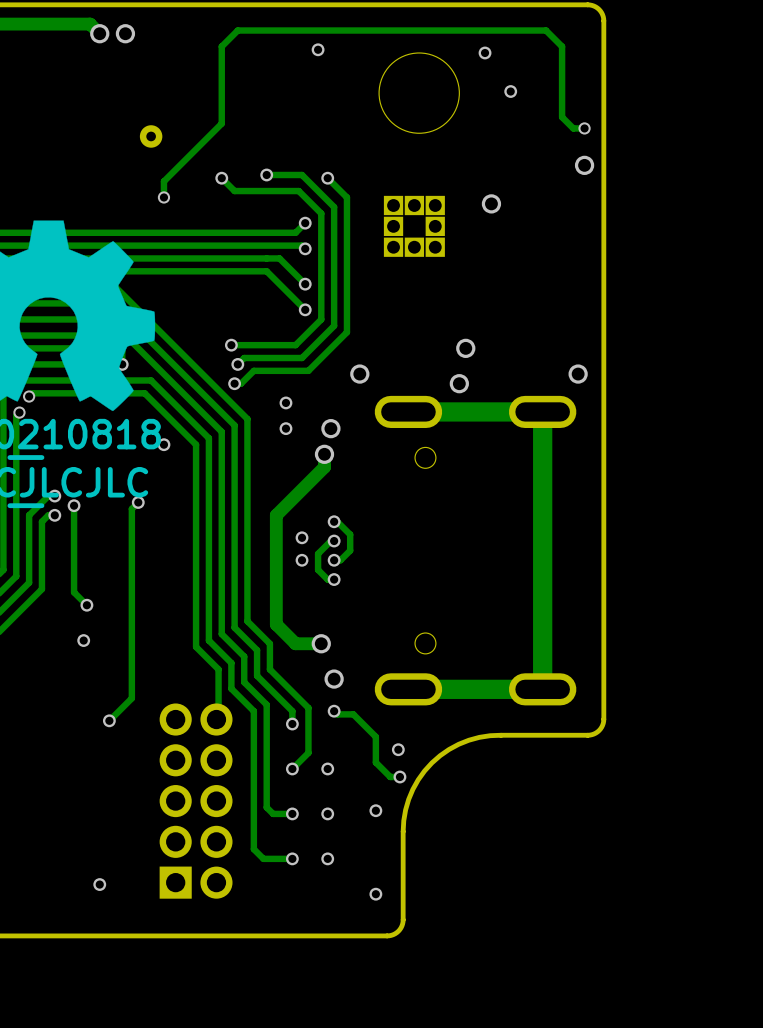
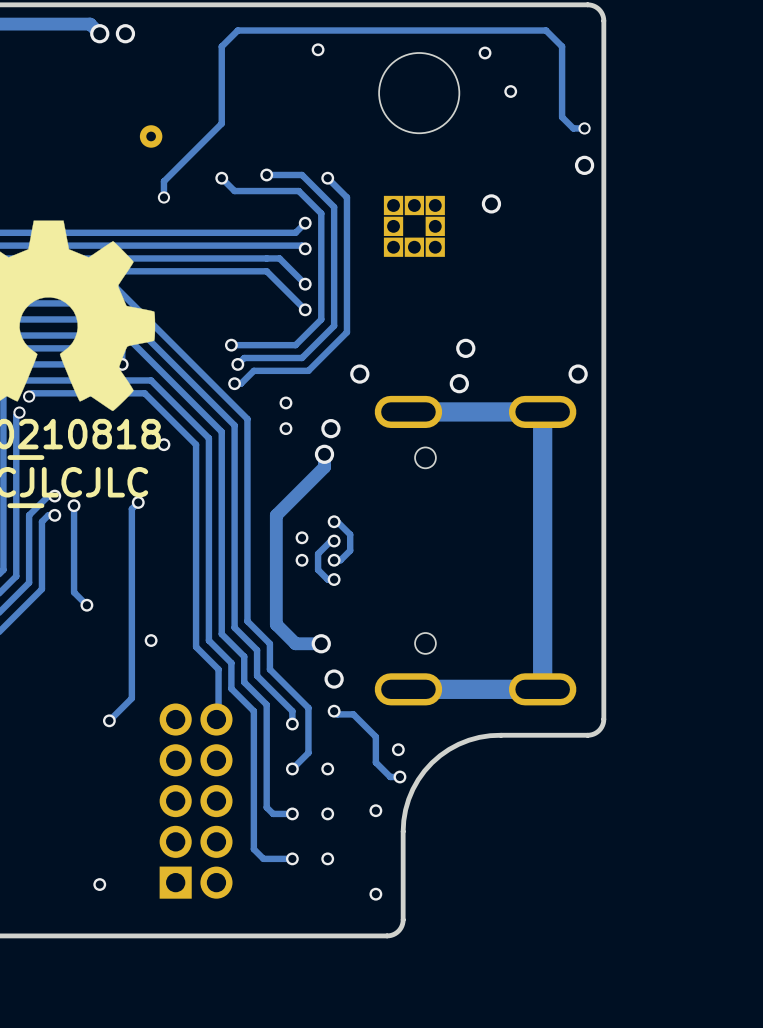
via position: (83, 640) -> (151, 640)

